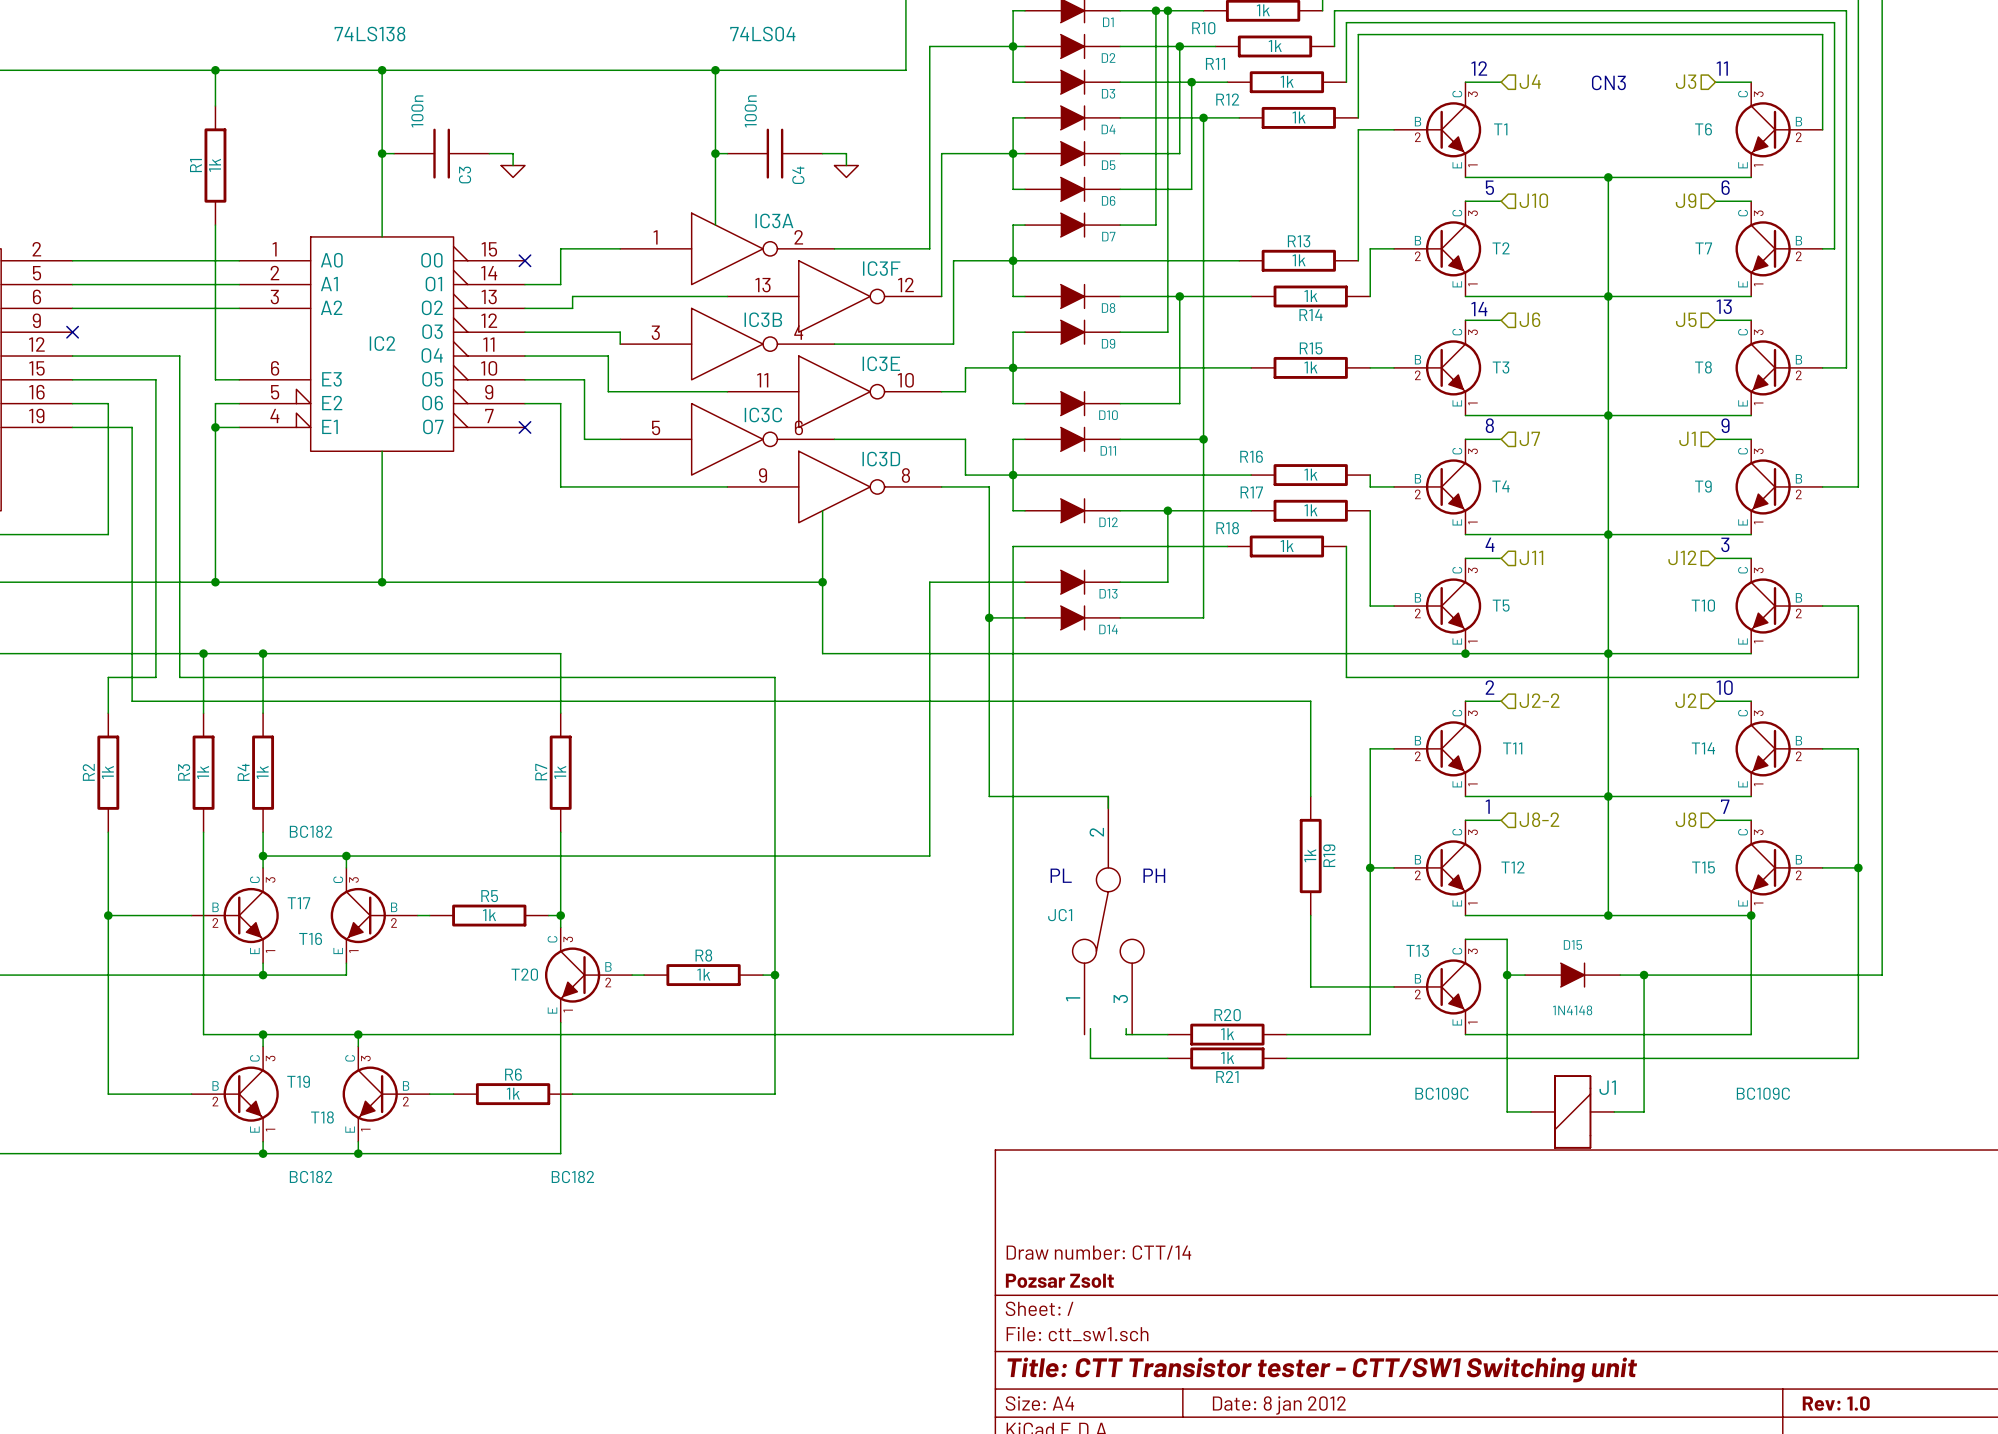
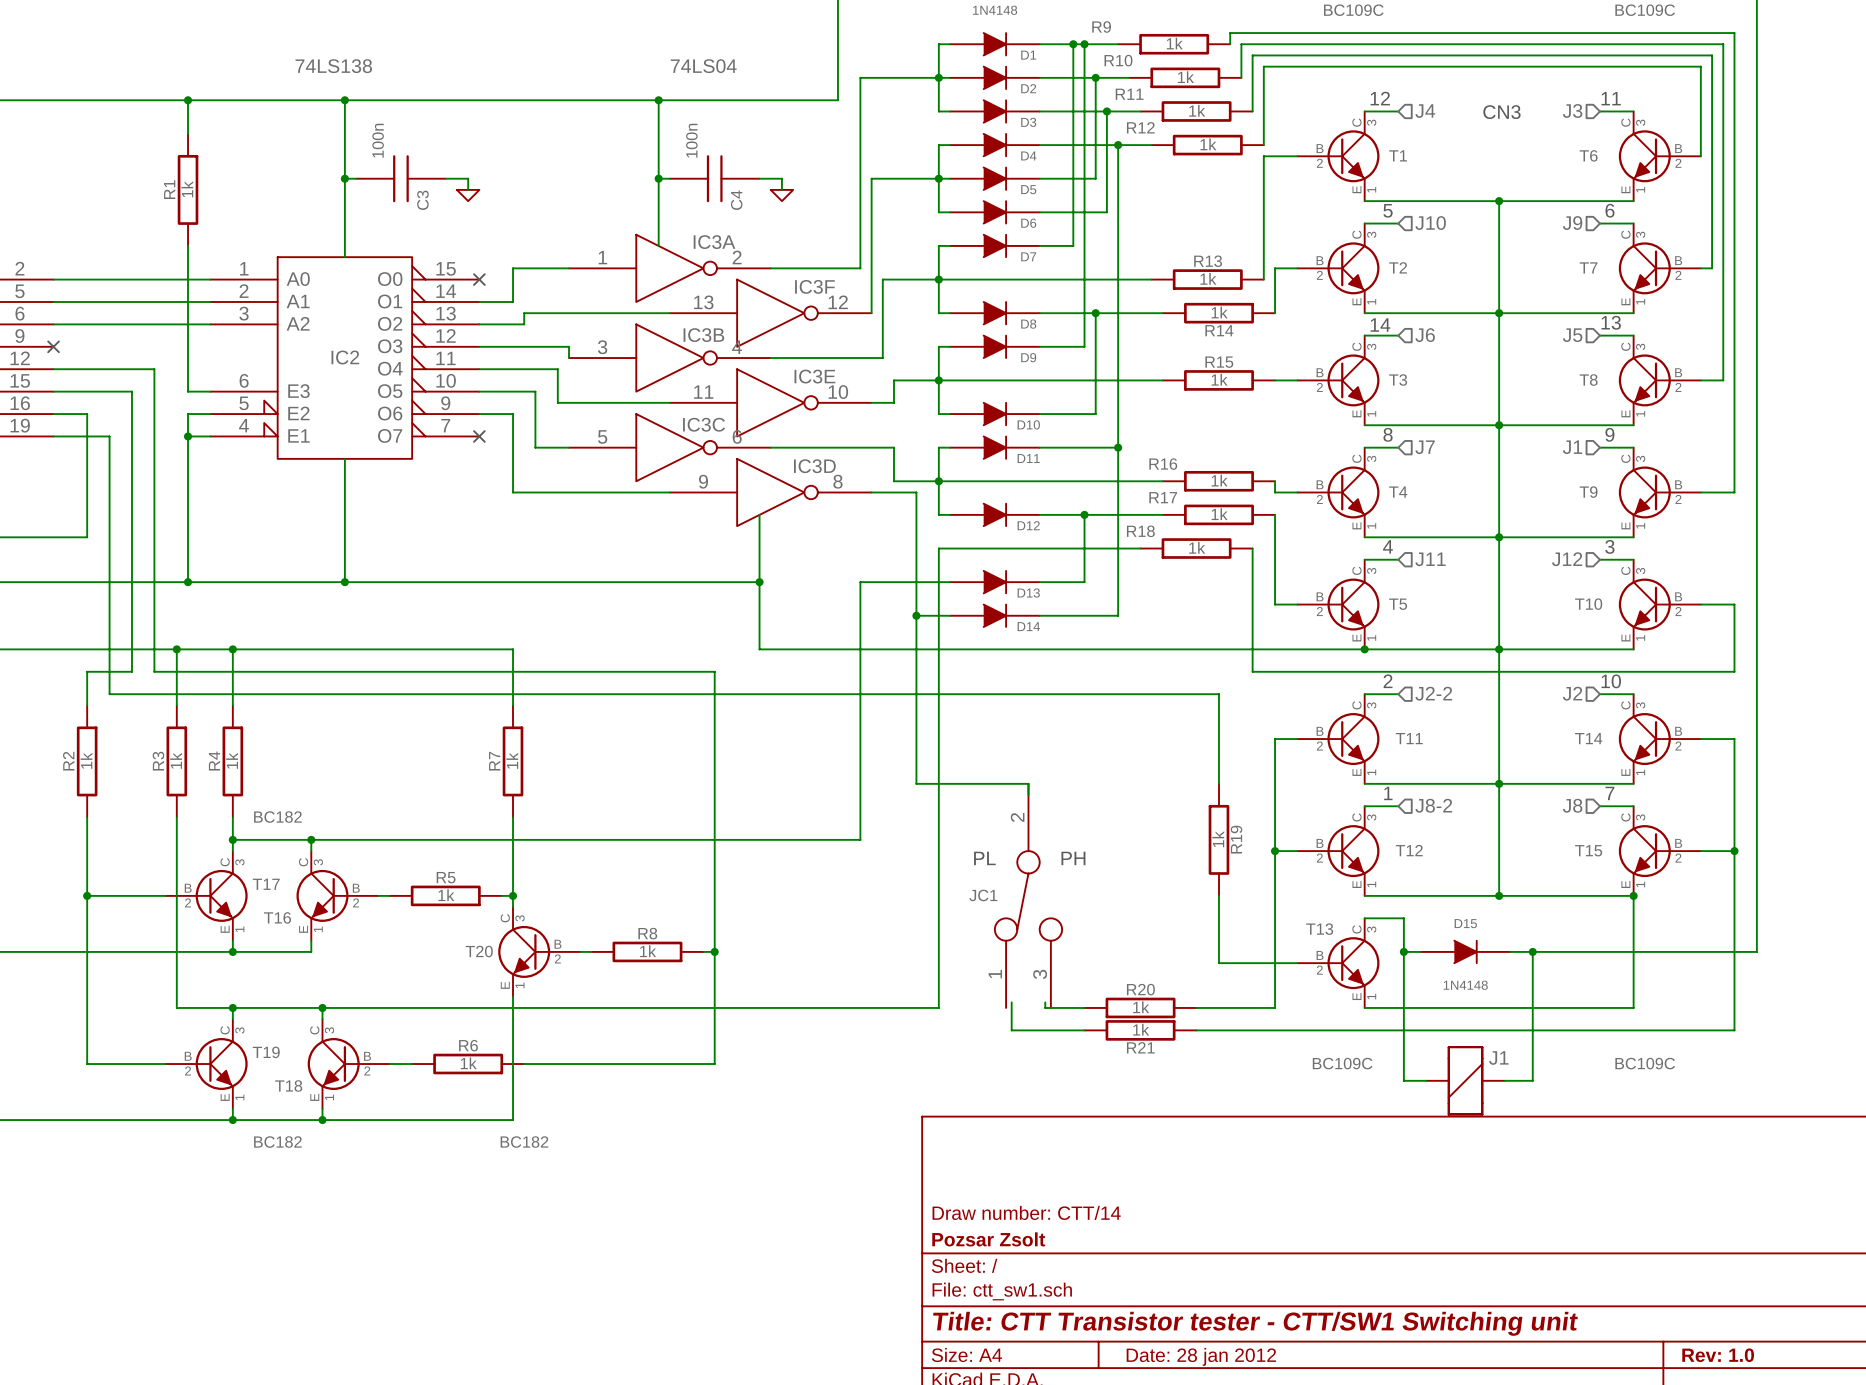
title block: Date: 8 jan 2012 (1279, 1405) -> Date: 28 jan 2012 (1201, 1356)

